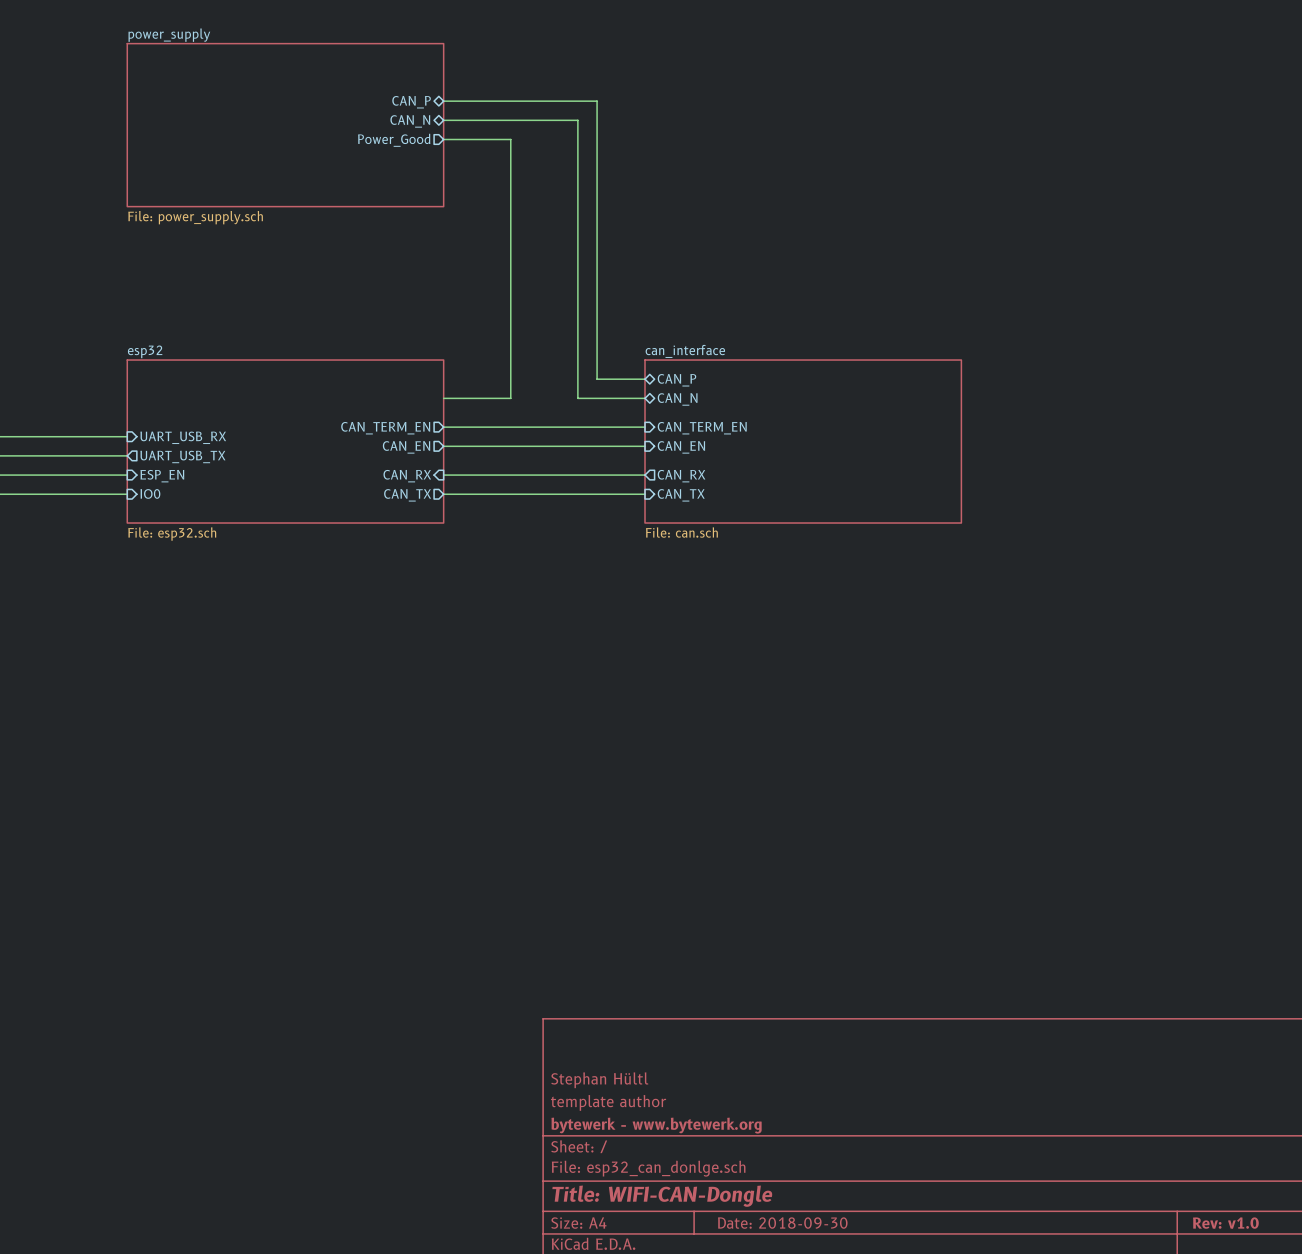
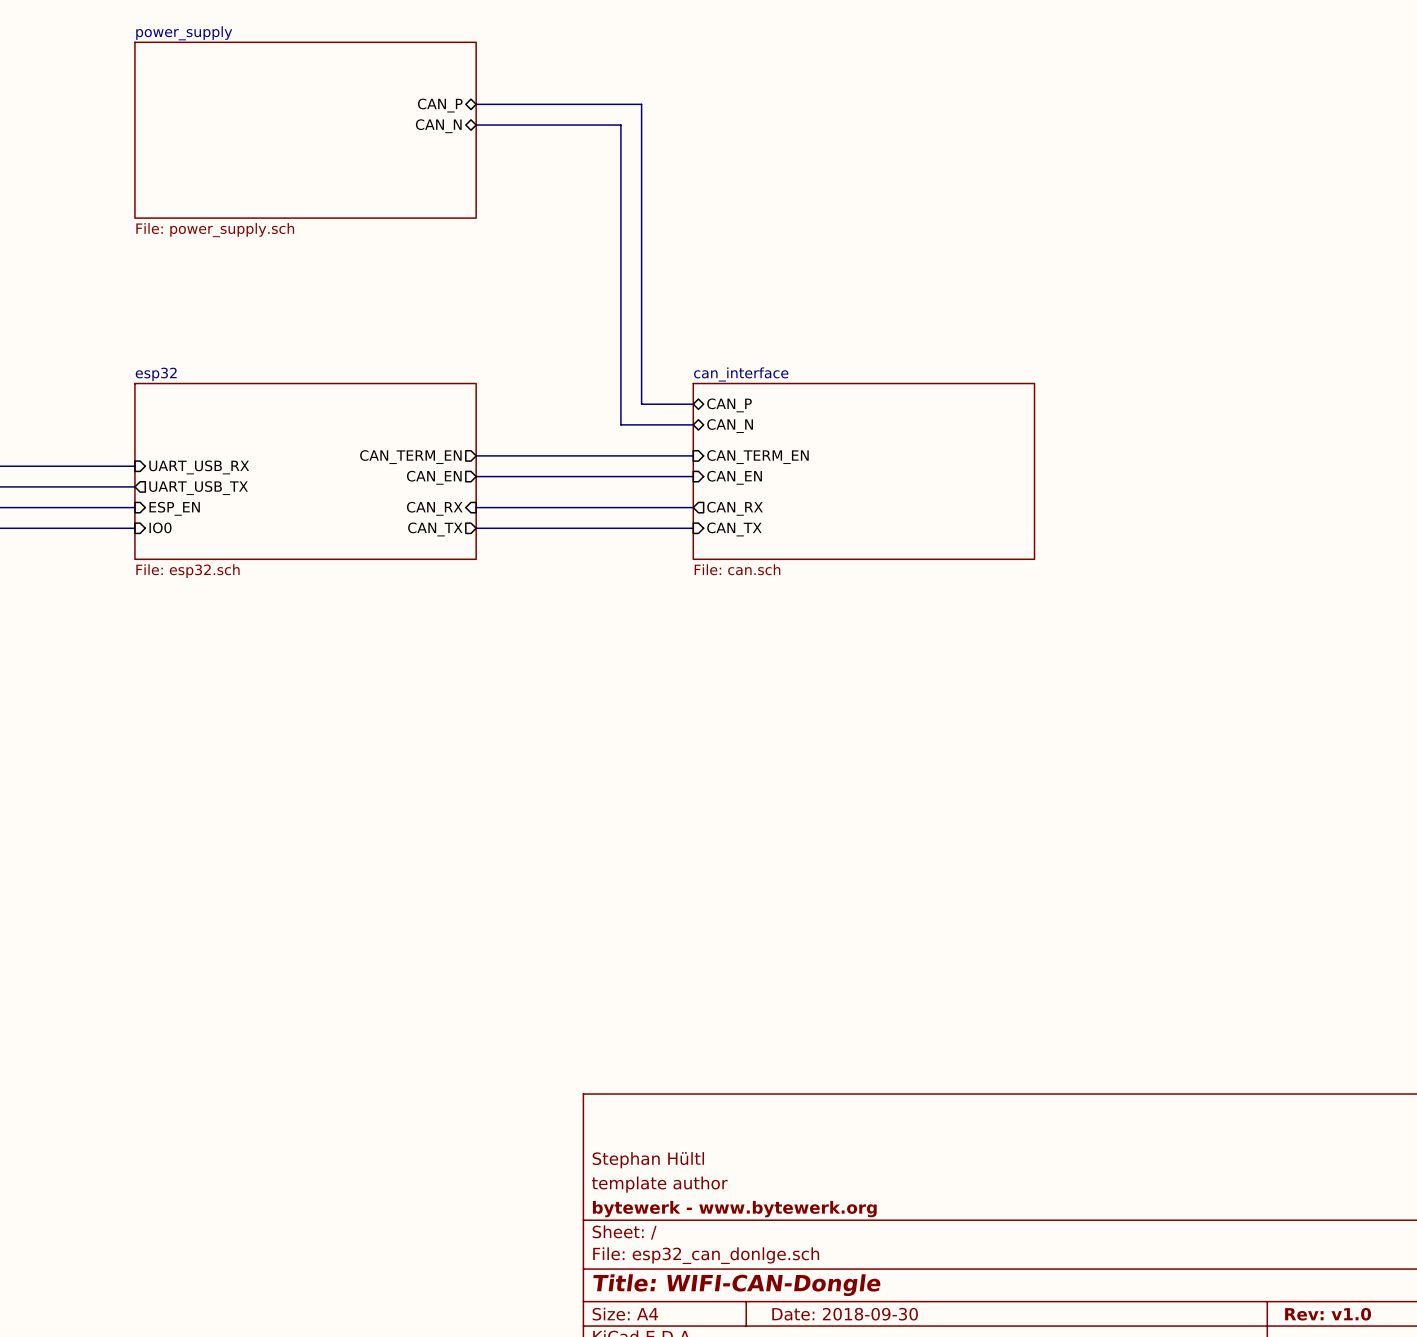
wire: (443, 139) (510, 139) (510, 398) (443, 398) -> none
sheet pin: Power_Good (394, 140) -> none

